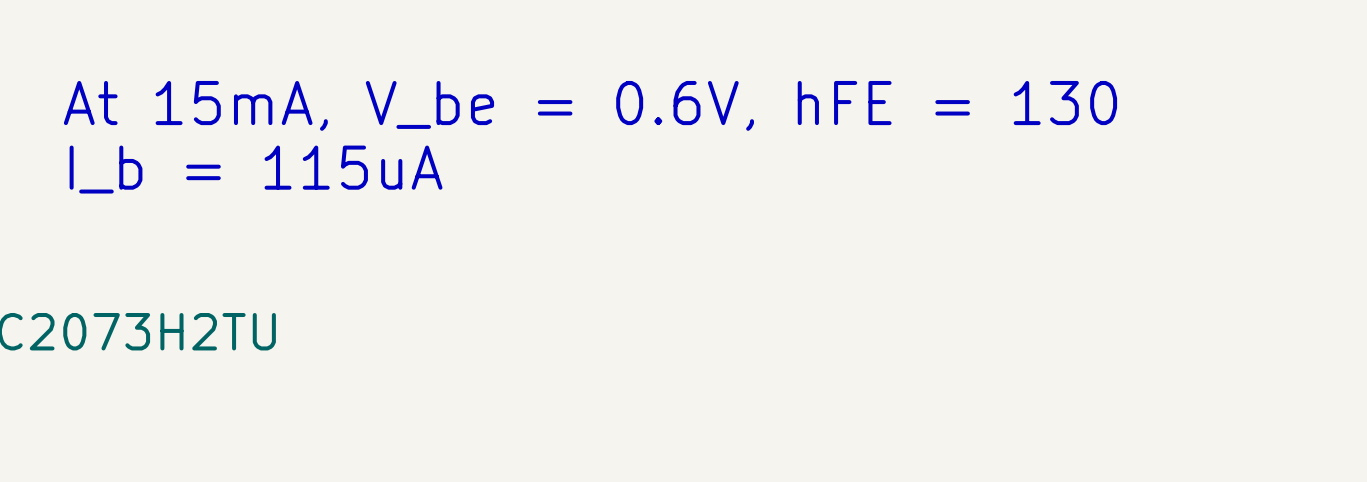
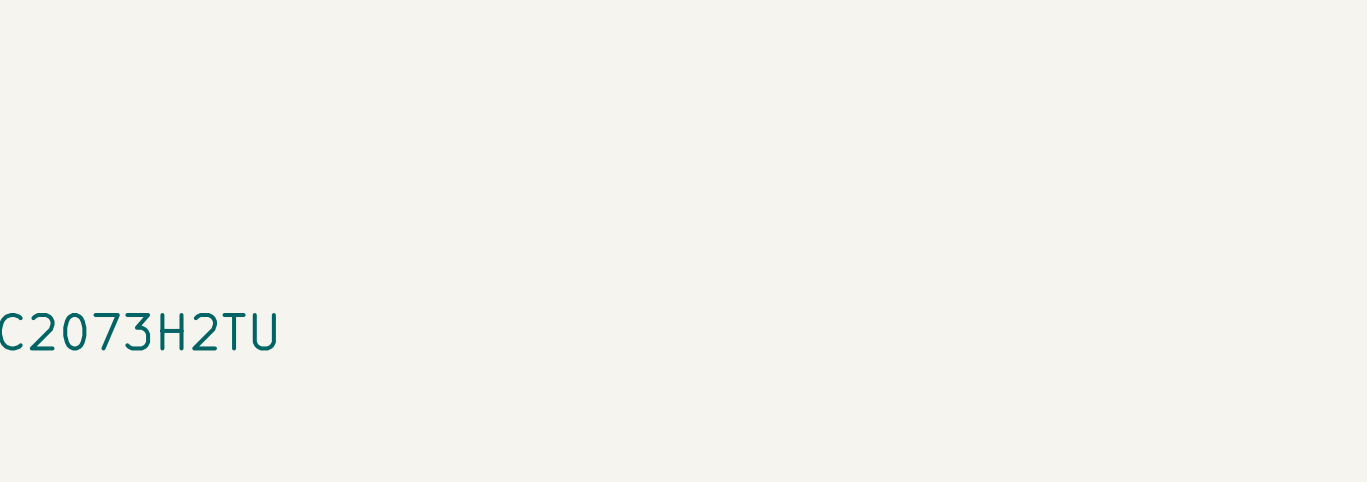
text: At 15mA, V_be = 0.6V, hFE = 130 (590, 105) -> none
text: I_b = 115uA (256, 169) -> none

